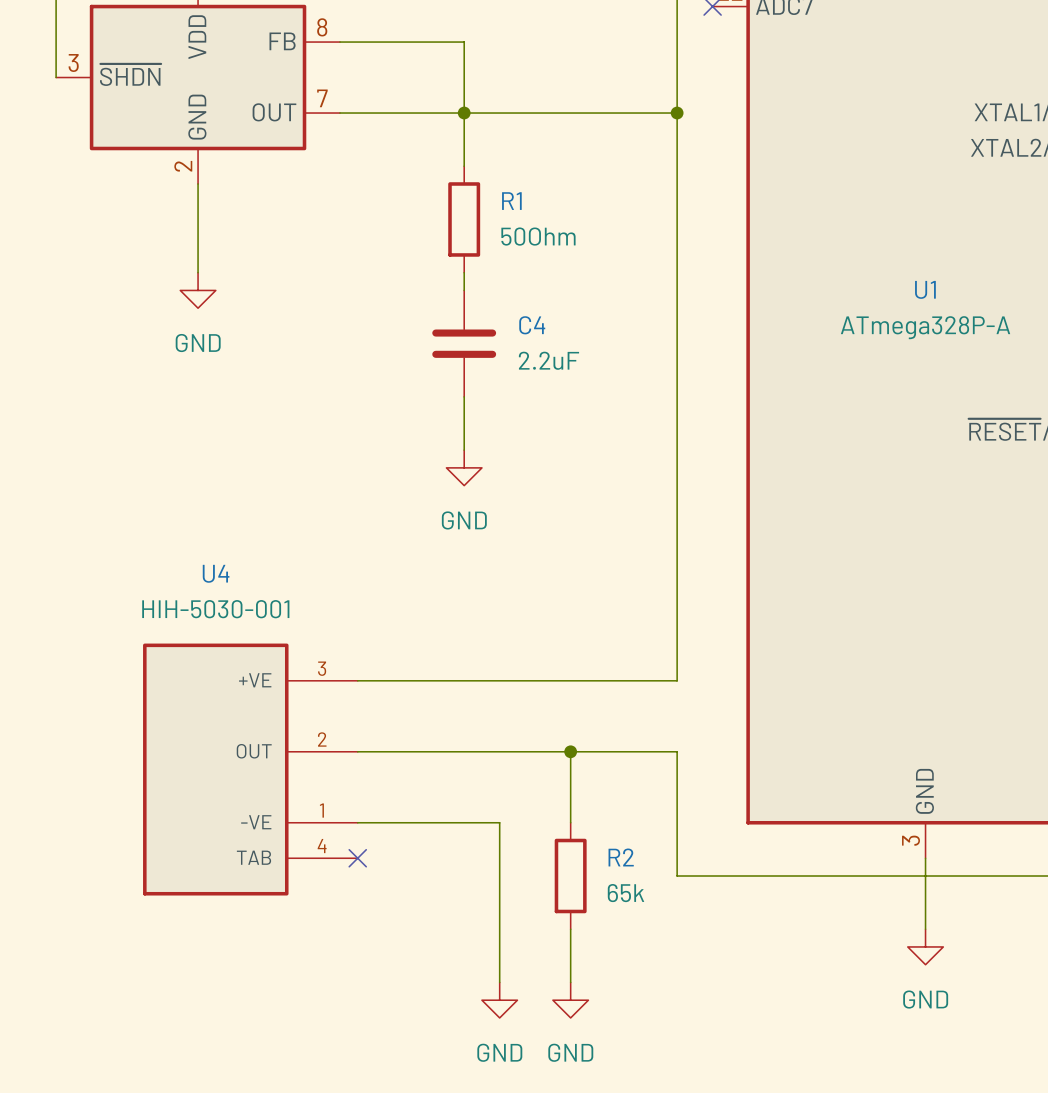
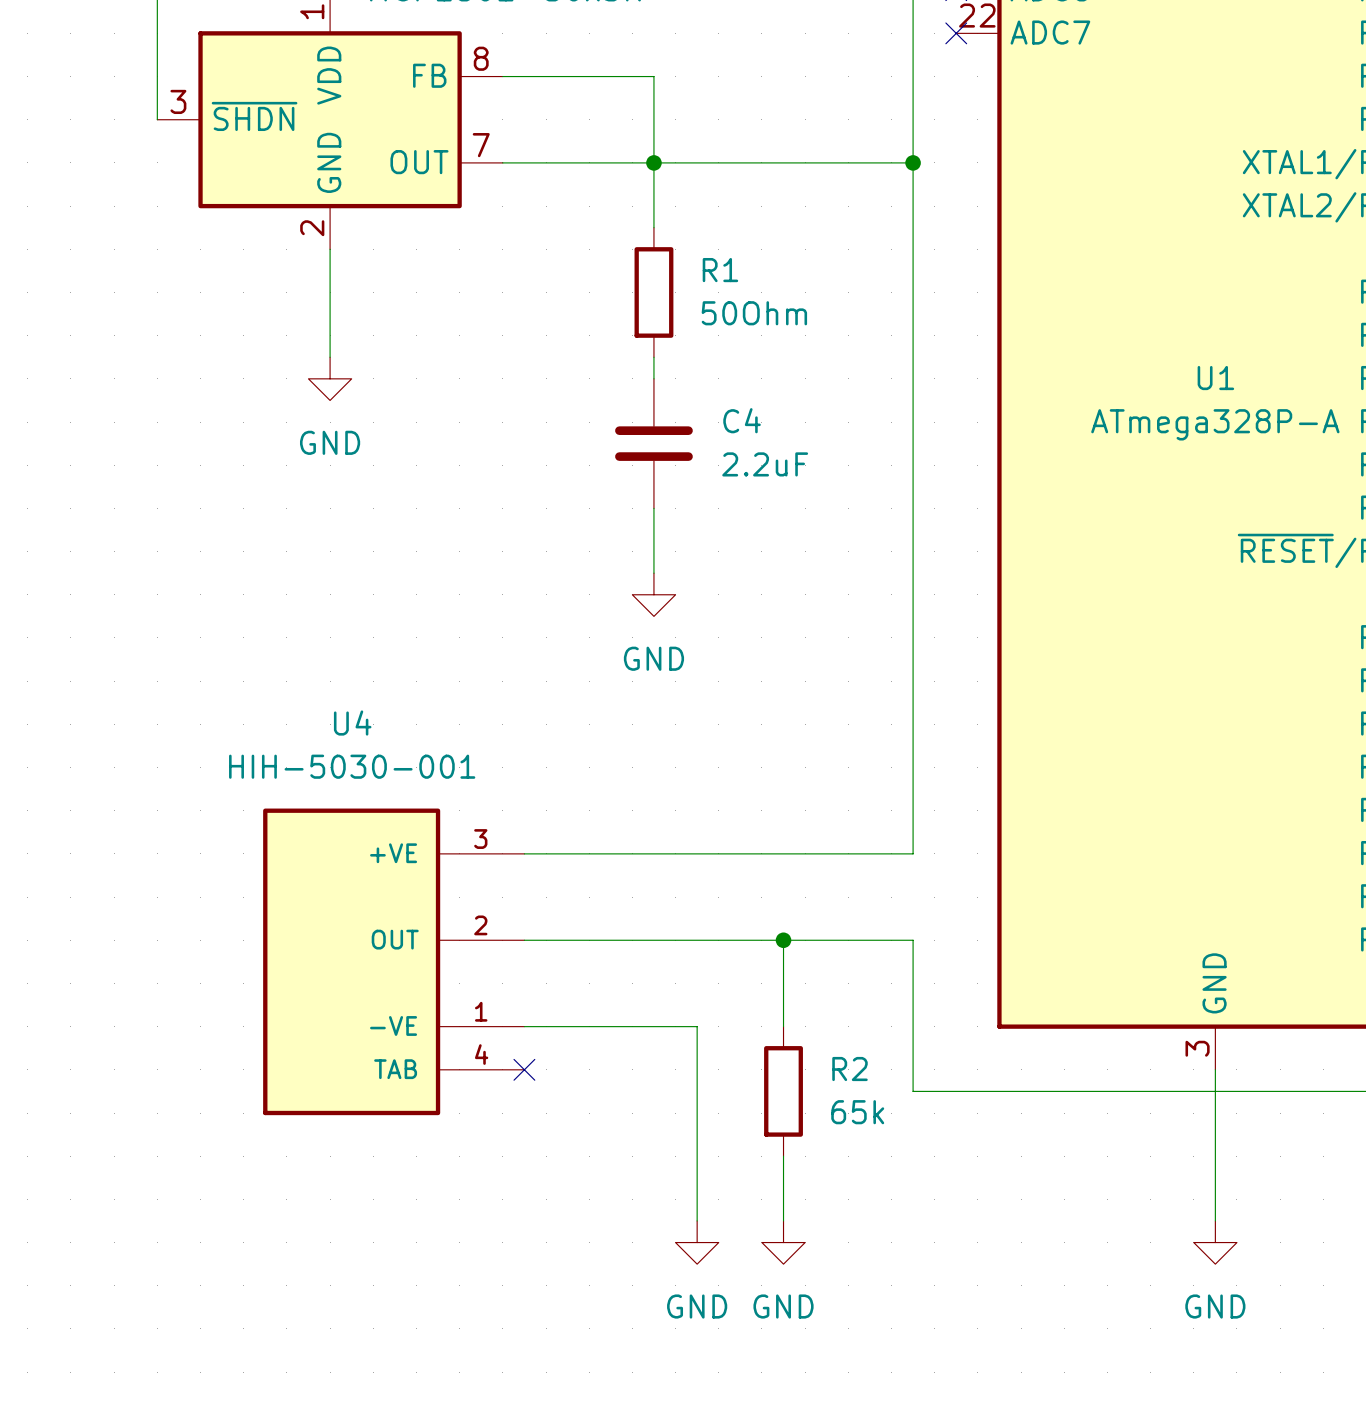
wire: none -> (1215, 1156) (1215, 1220)
power symbol position: GND (925, 946) -> GND (1215, 1242)

